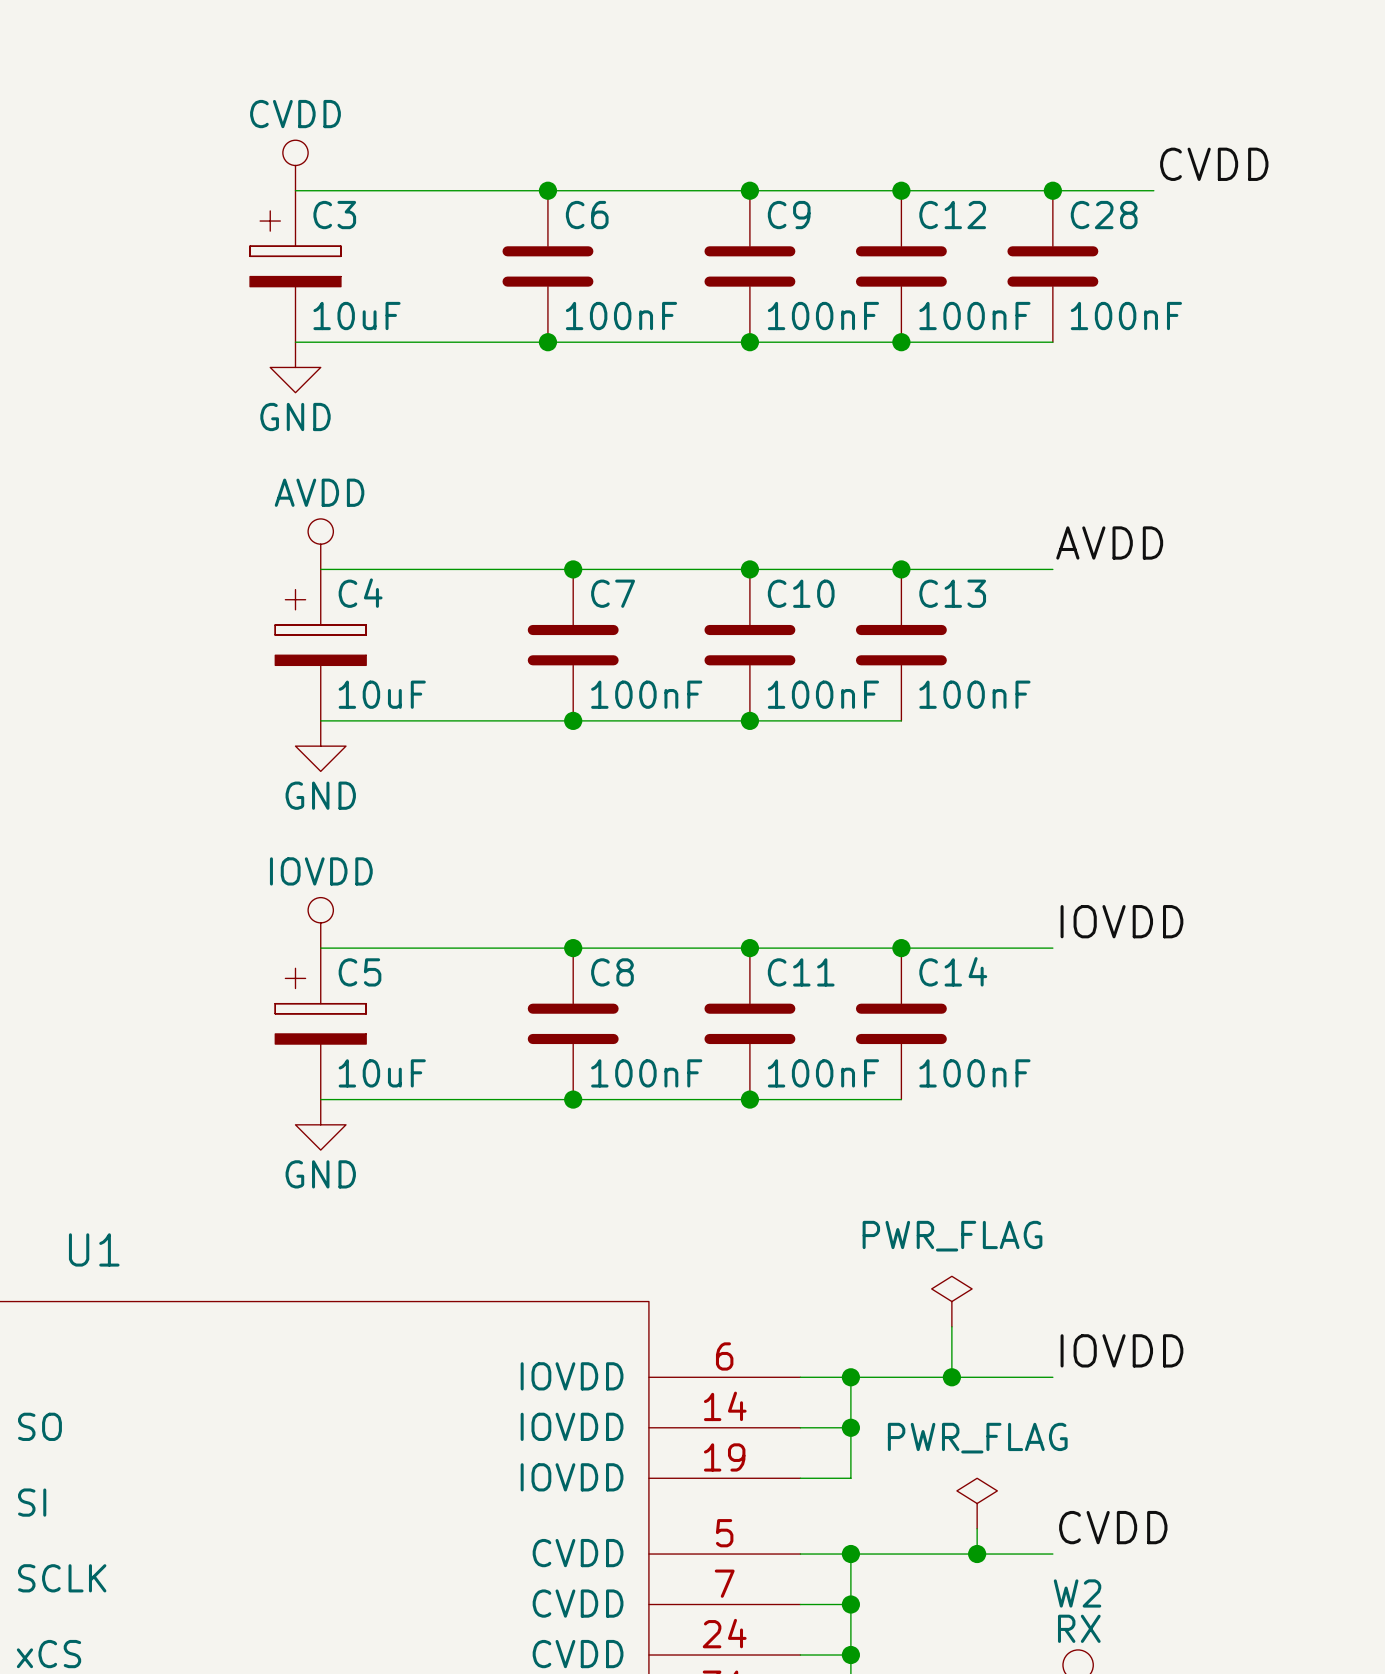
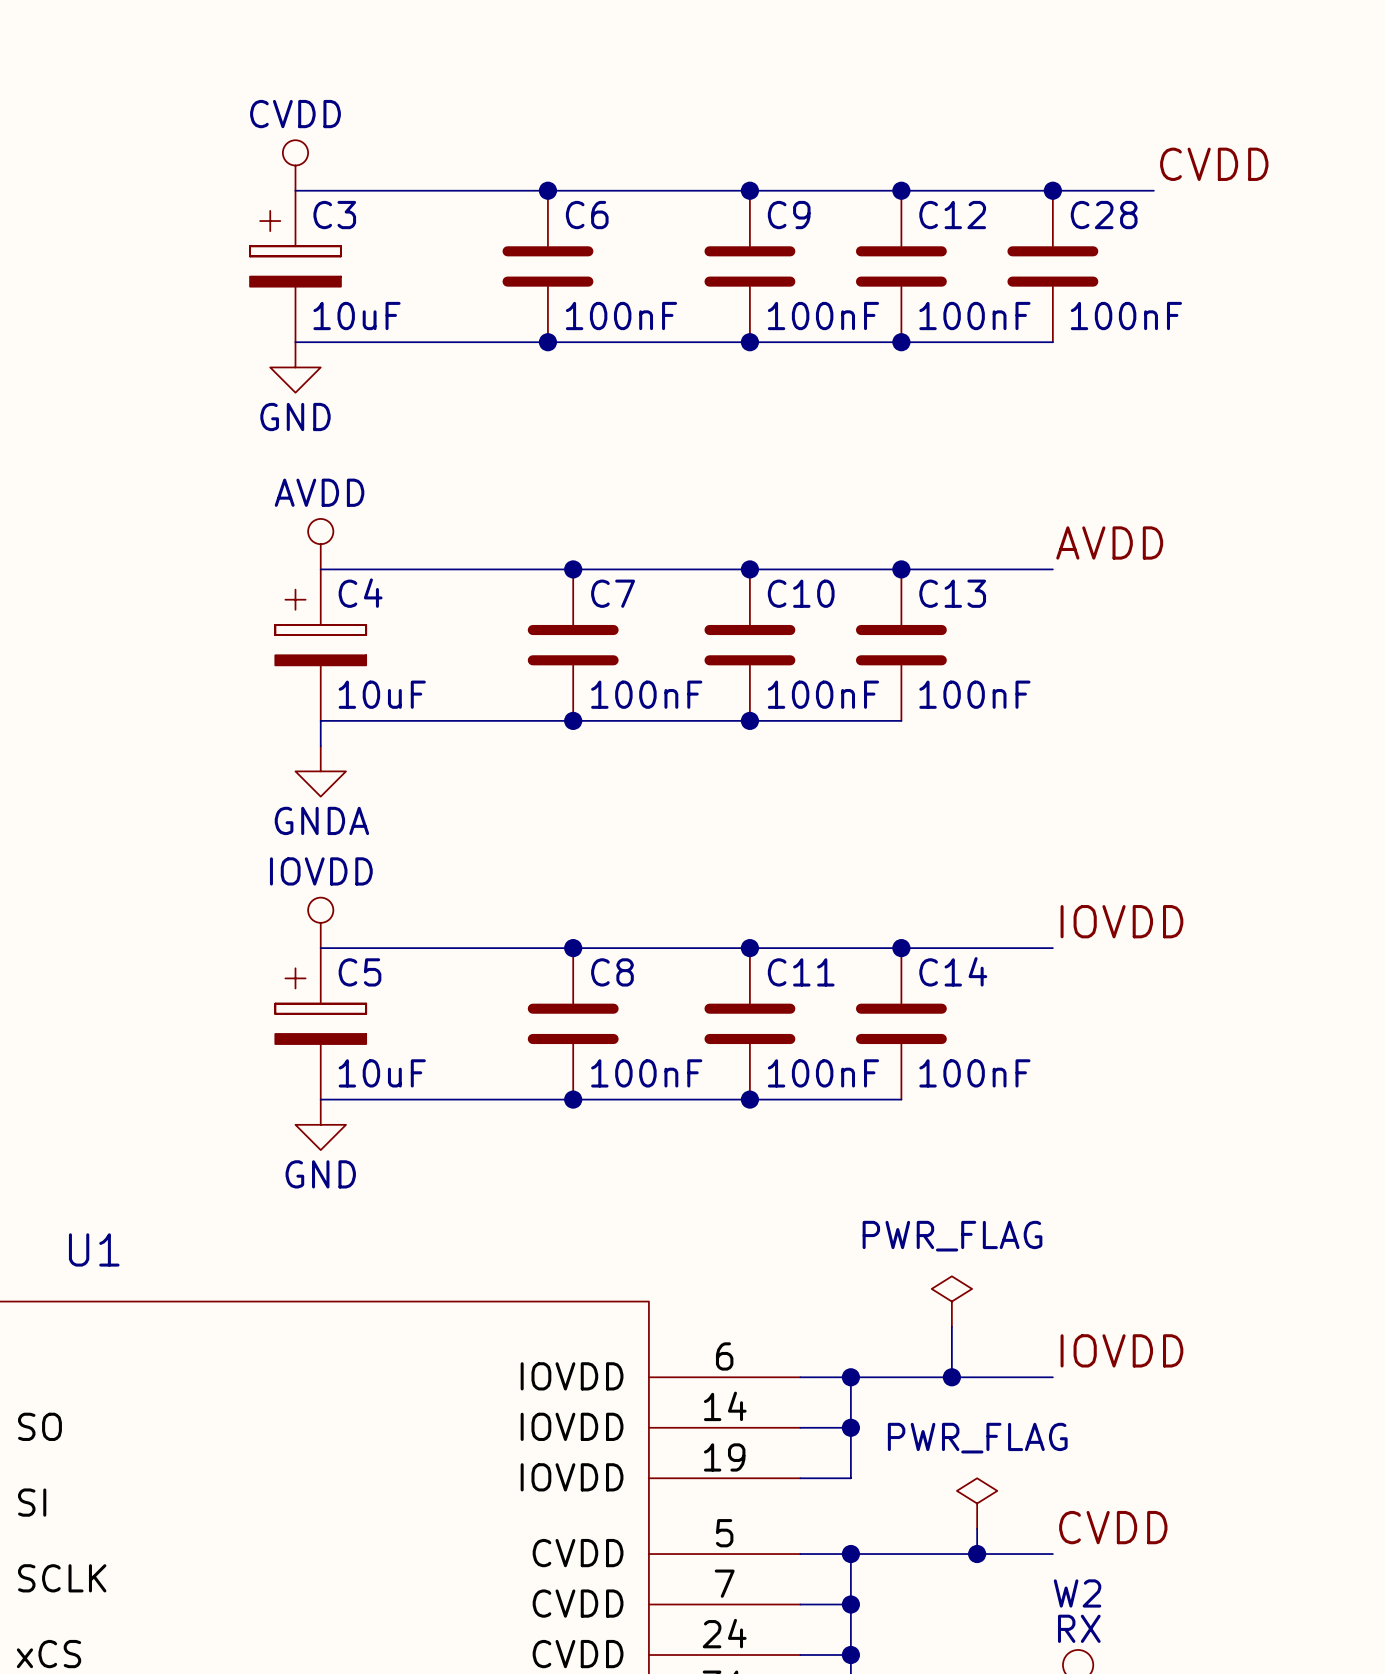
power symbol: GND (320, 746) -> none
power symbol: none -> GNDA (320, 771)

